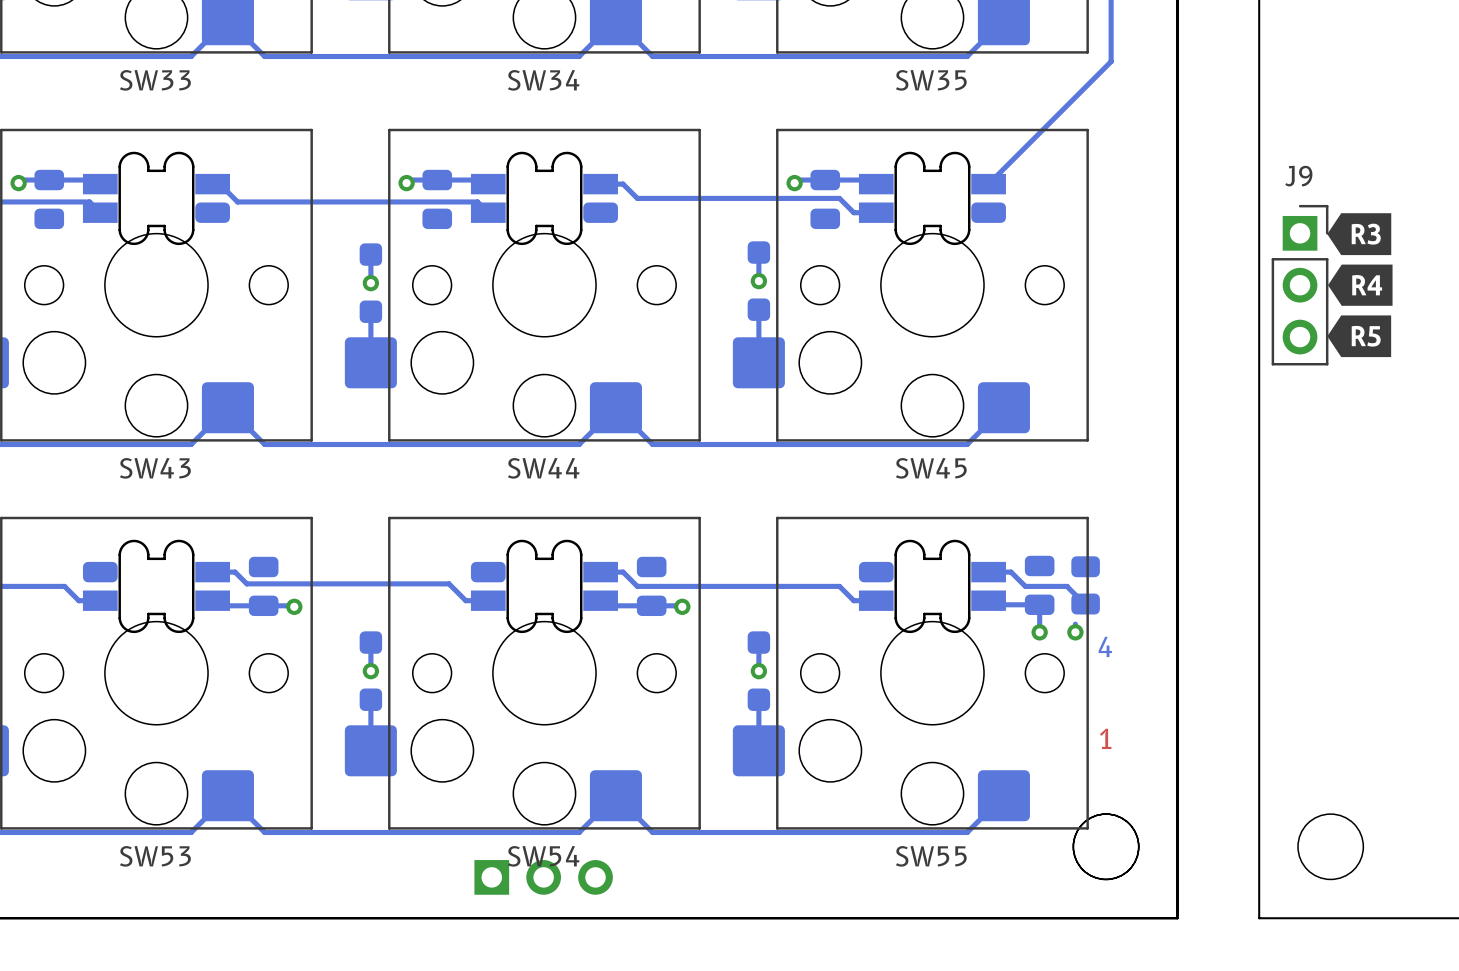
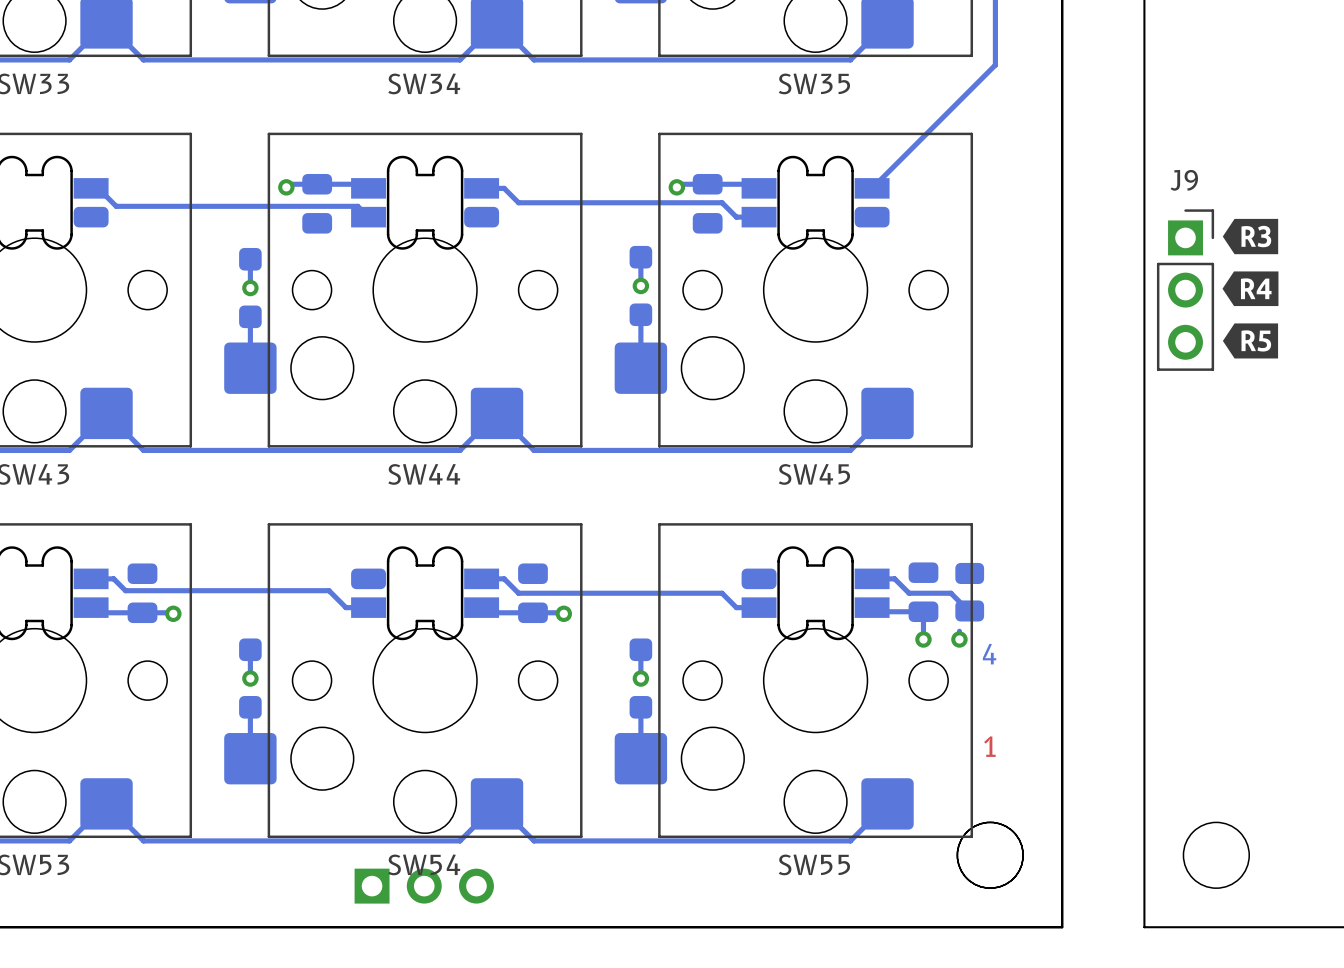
drawing shape: [1327, 213, 1392, 256] -> [1222, 218, 1279, 255]
drawing shape: [1328, 264, 1393, 306] -> [1222, 271, 1279, 307]
drawing shape: [1327, 315, 1392, 358] -> [1222, 323, 1279, 359]

